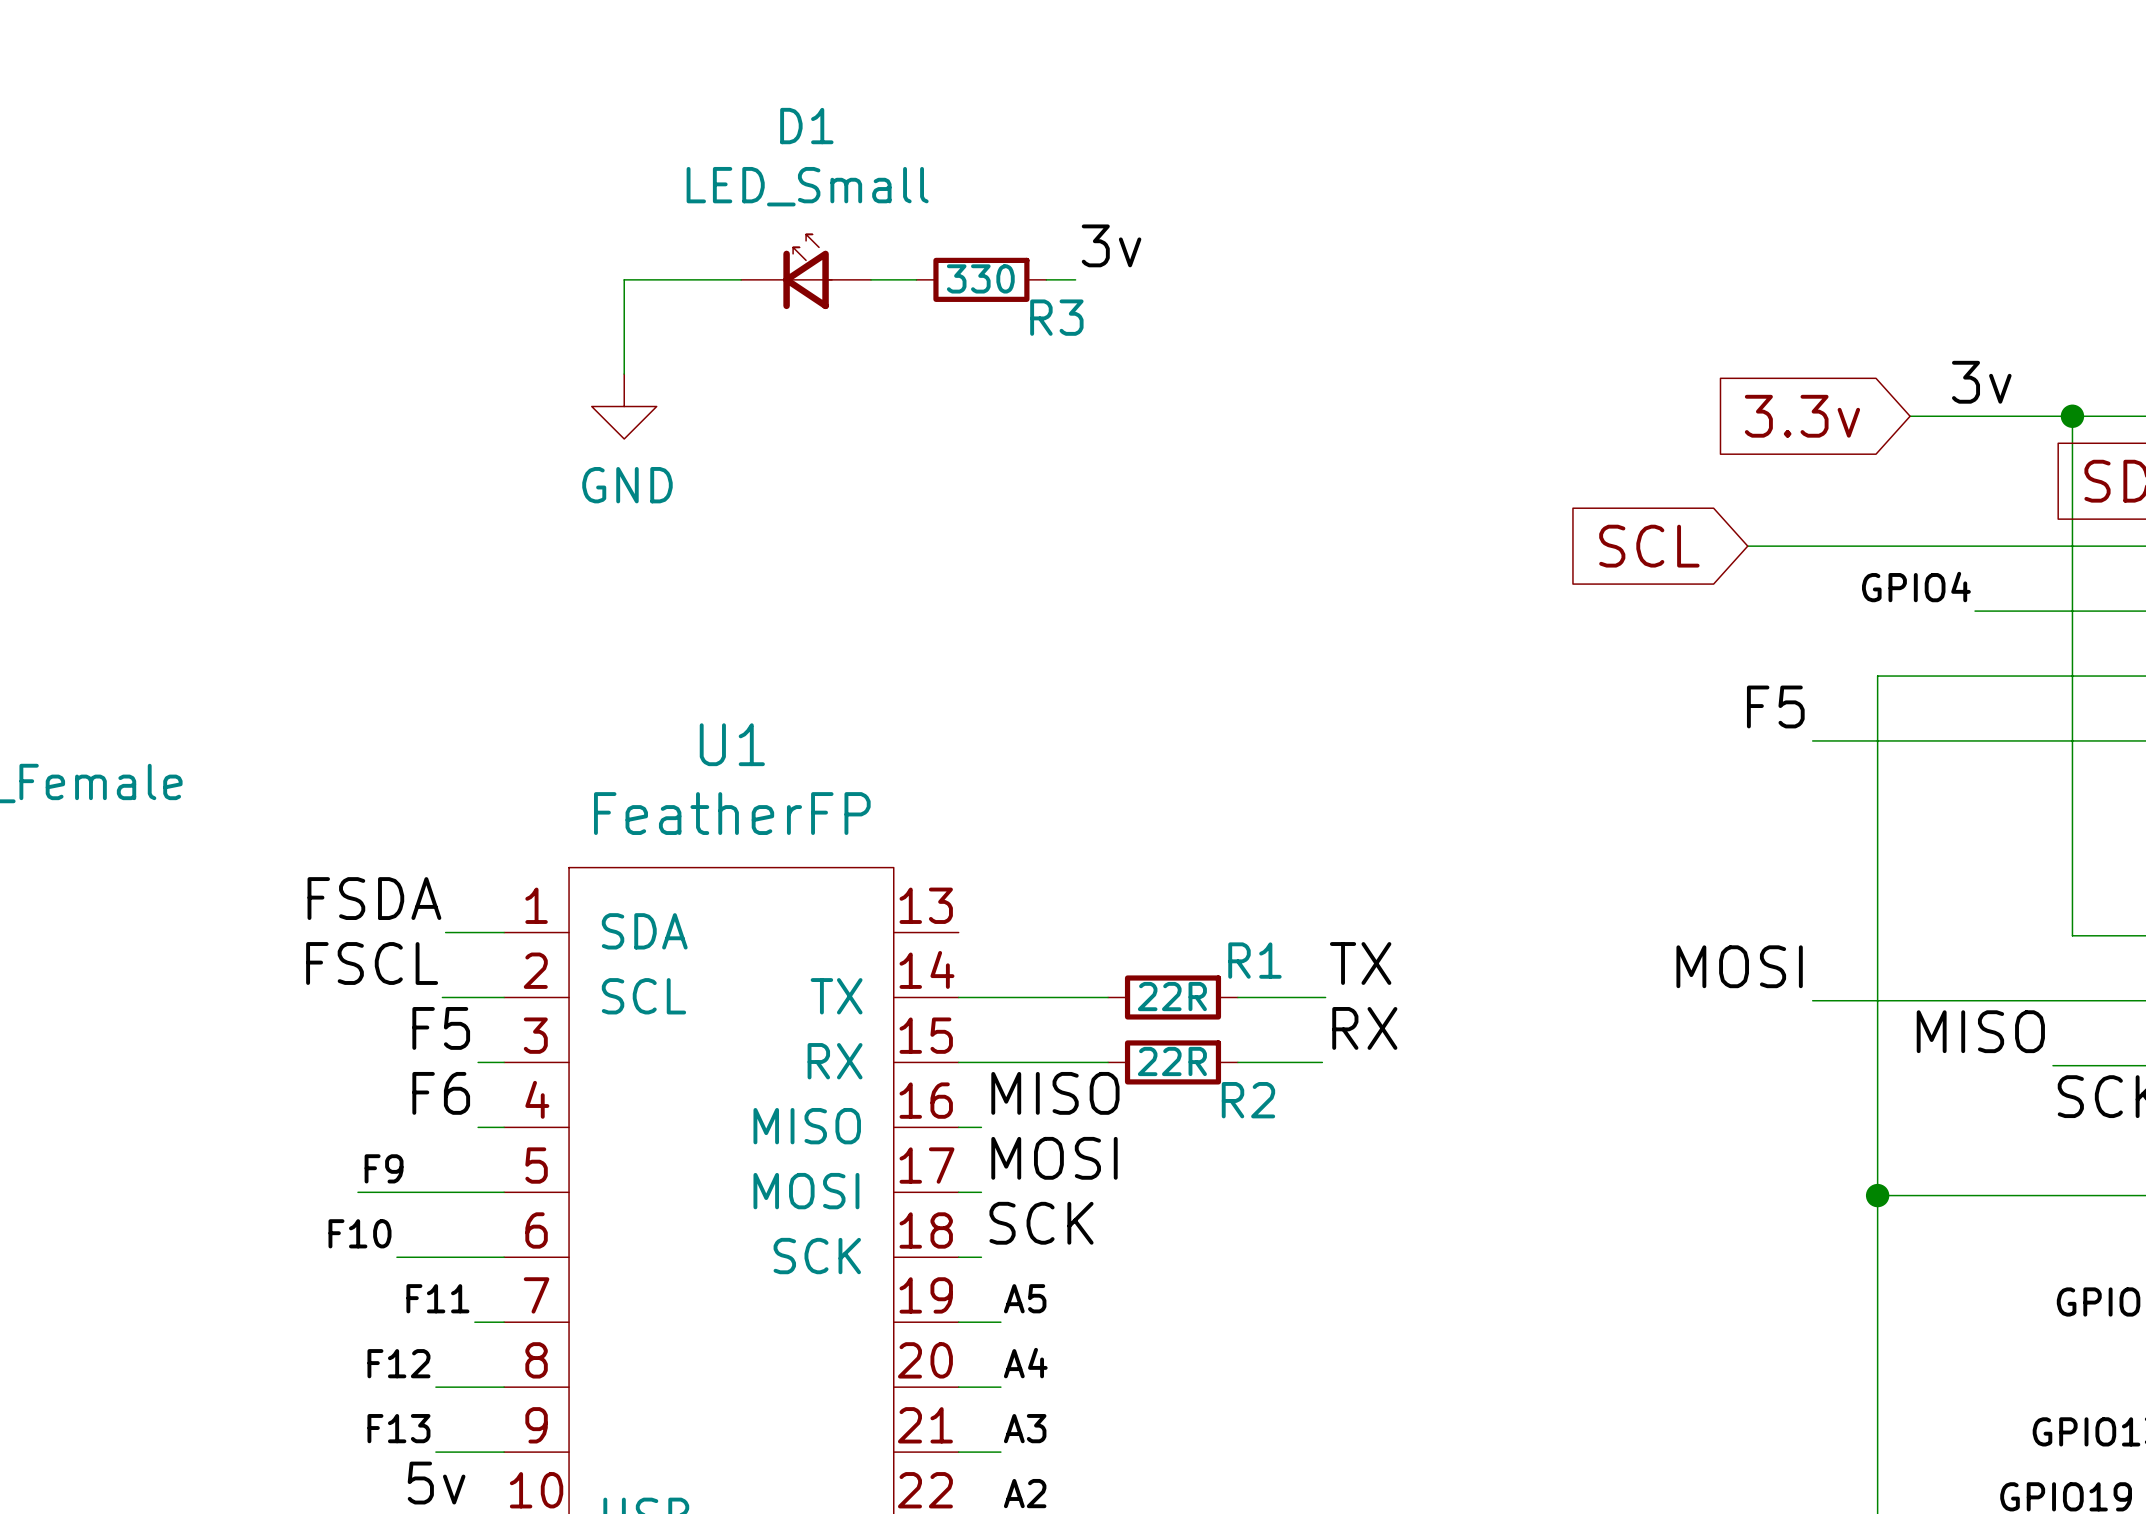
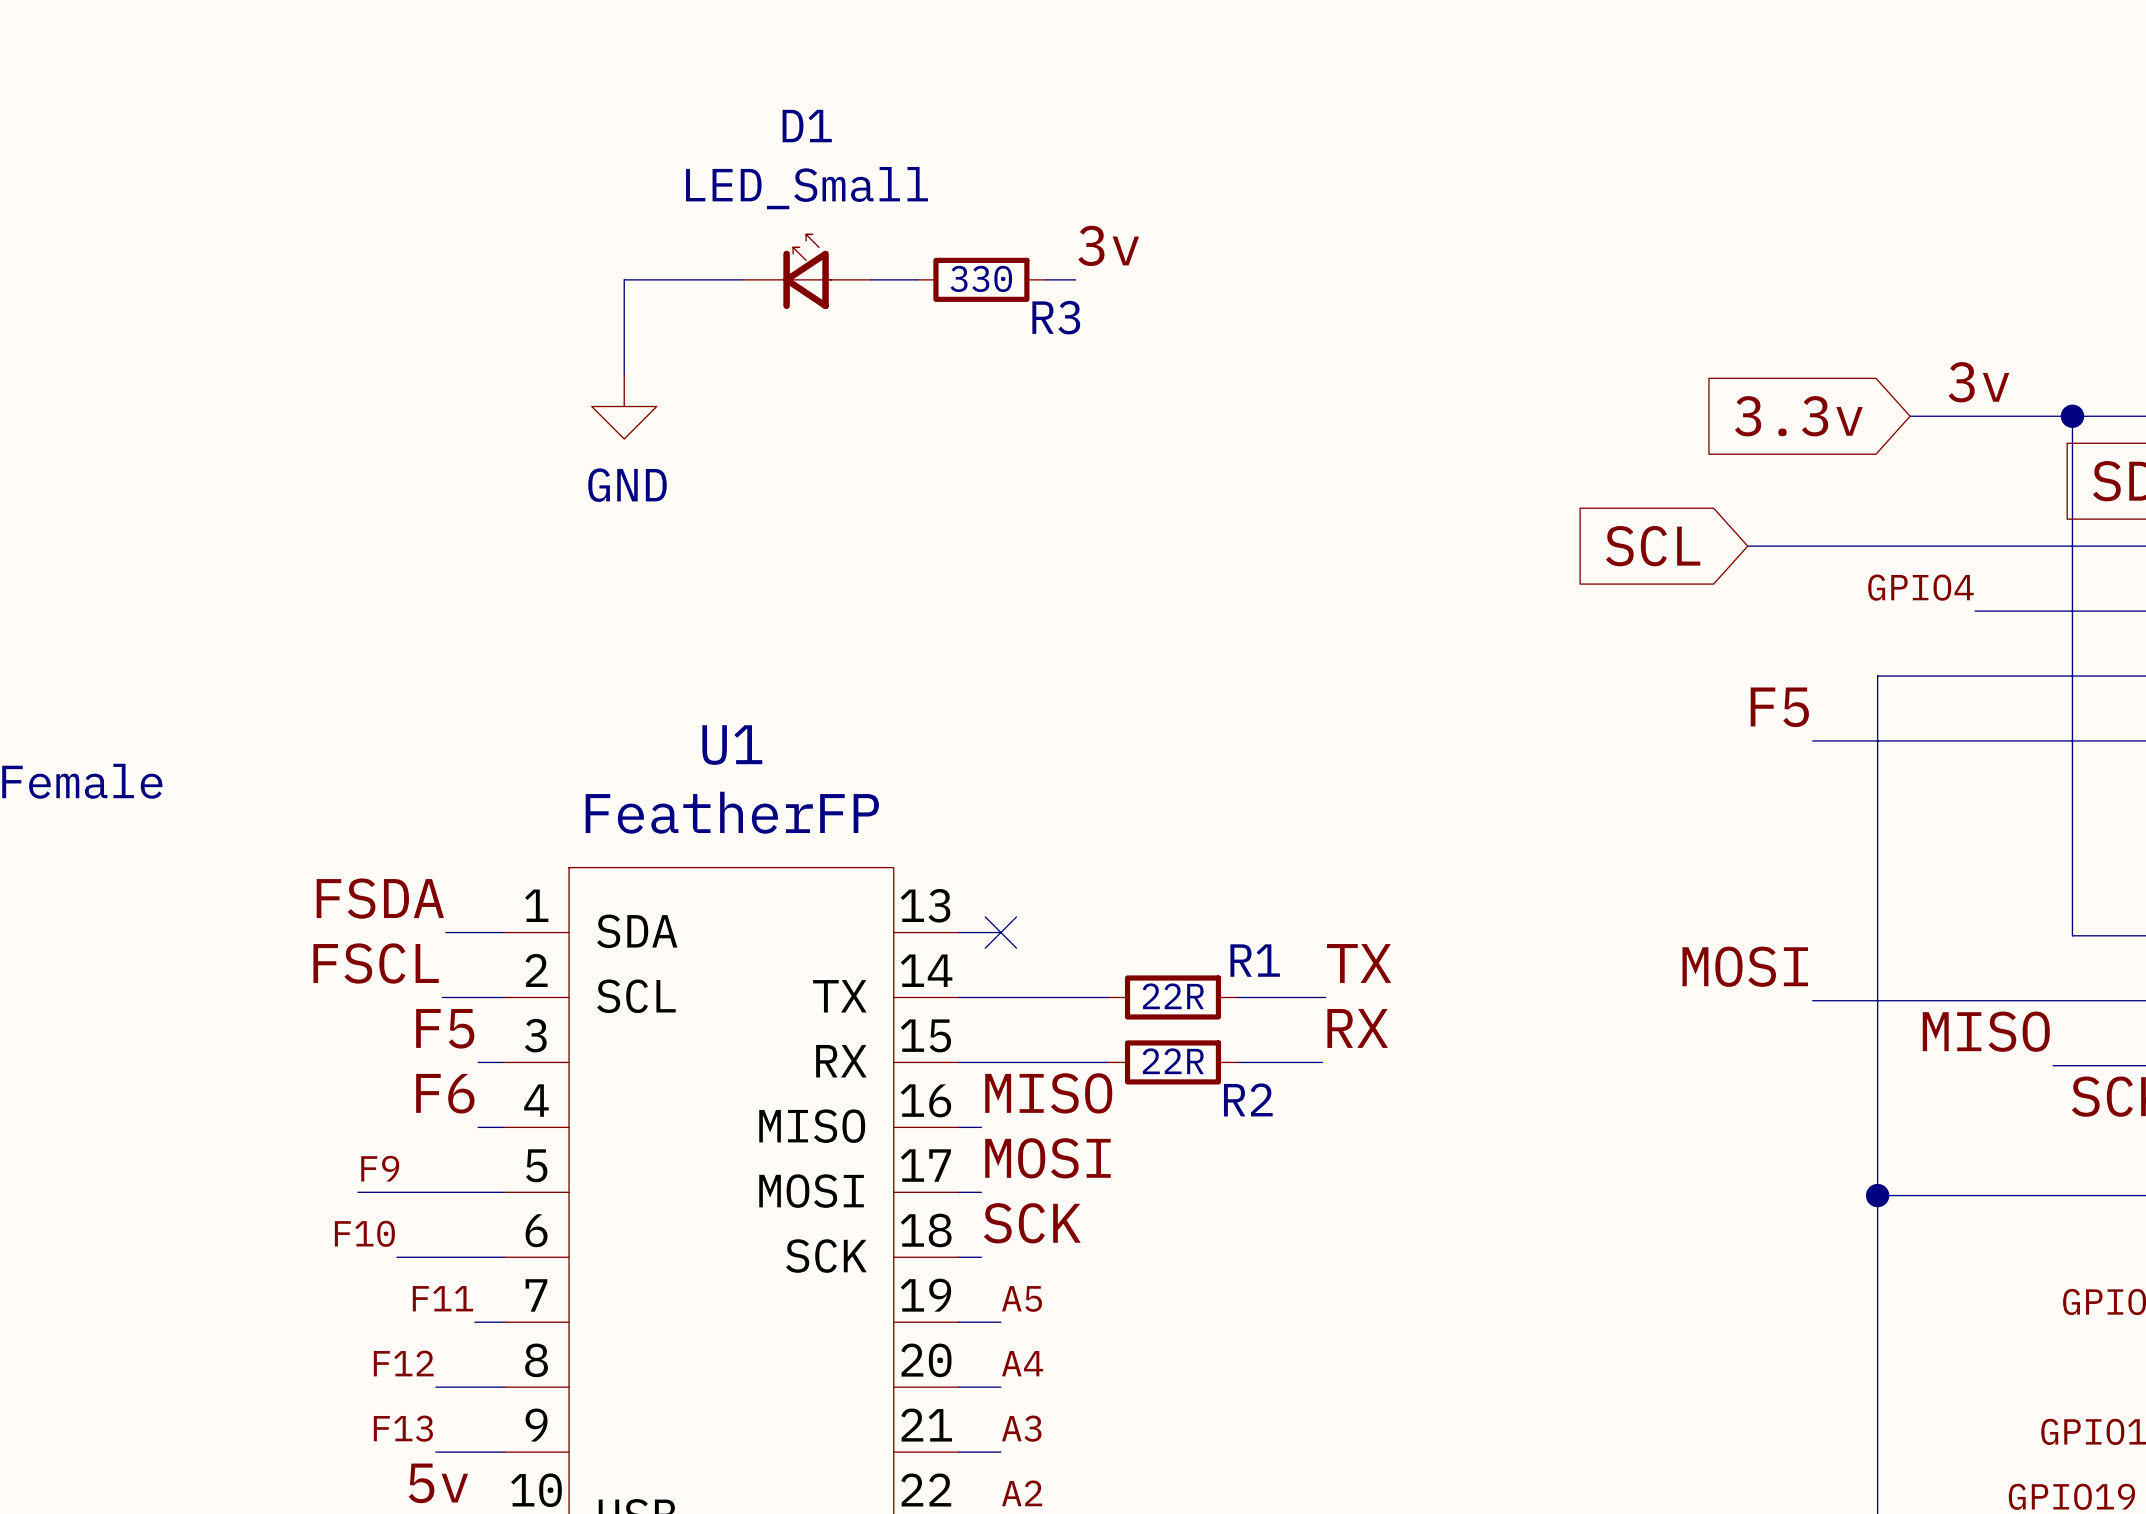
wire: none -> (958, 932) (1000, 932)
no-connect mark: none -> (1000, 932)

